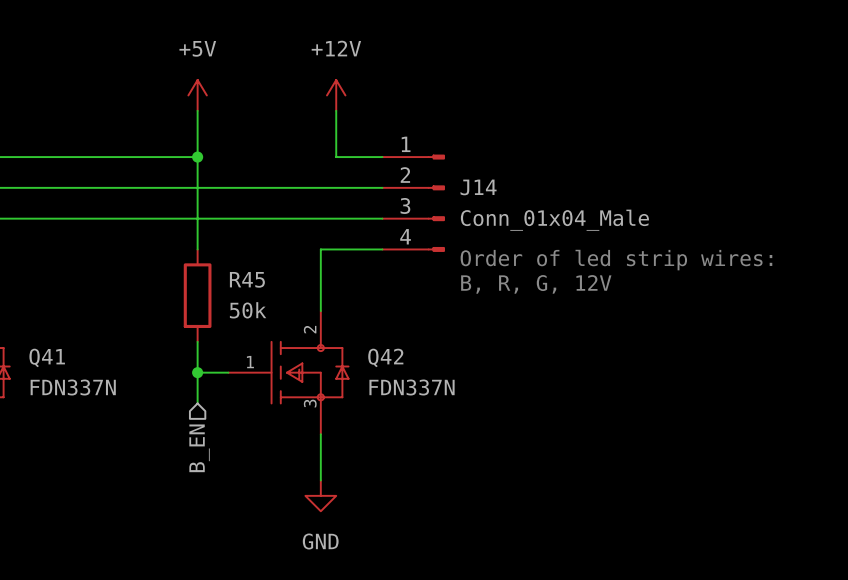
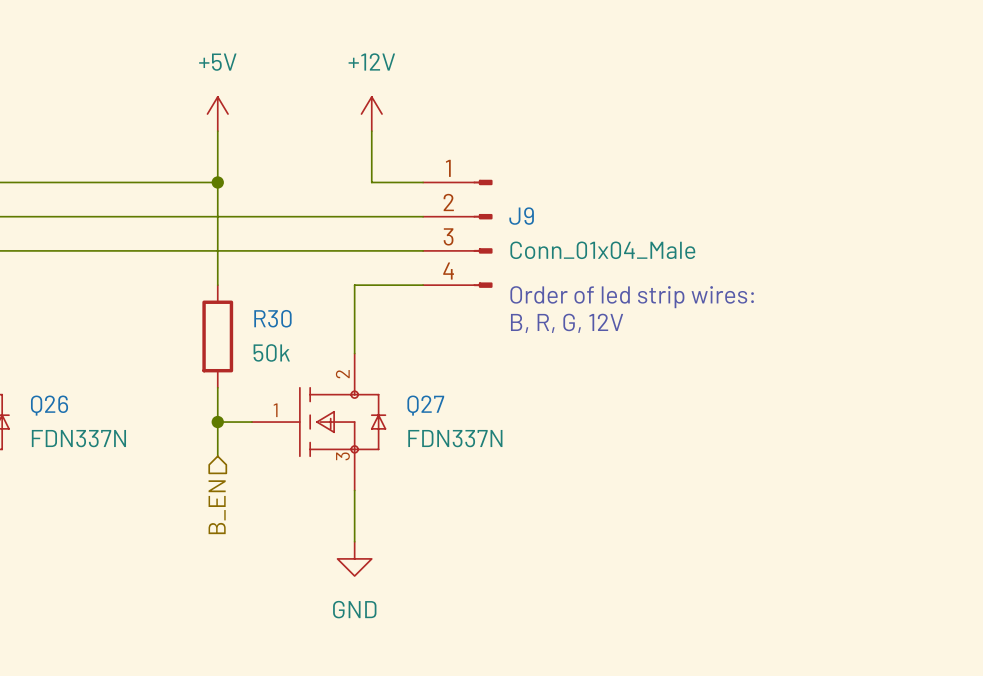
J14 name: J14 (478, 187) -> J9 (521, 216)
R45 name: R45 (247, 279) -> R30 (272, 318)
Q41 name: Q41 (47, 357) -> Q26 (49, 405)
Q42 name: Q42 (385, 357) -> Q27 (425, 405)

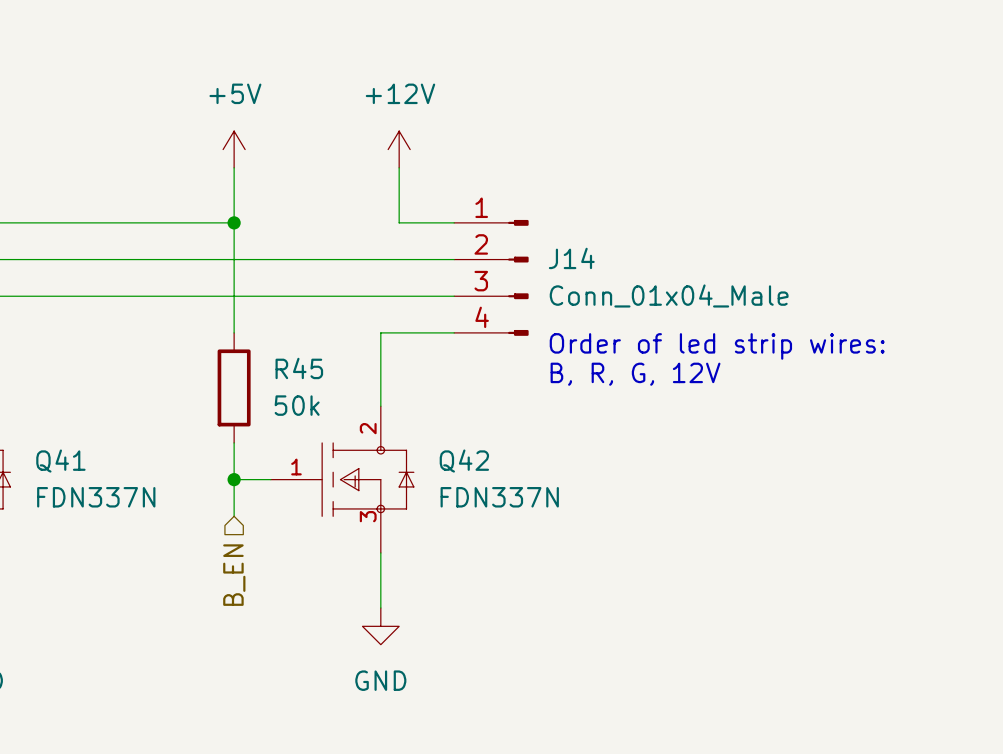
J9 name: J9 (521, 216) -> J14 (571, 258)
R30 name: R30 (272, 318) -> R45 (299, 368)
Q26 name: Q26 (49, 405) -> Q41 (60, 461)
Q27 name: Q27 (425, 405) -> Q42 (464, 461)

